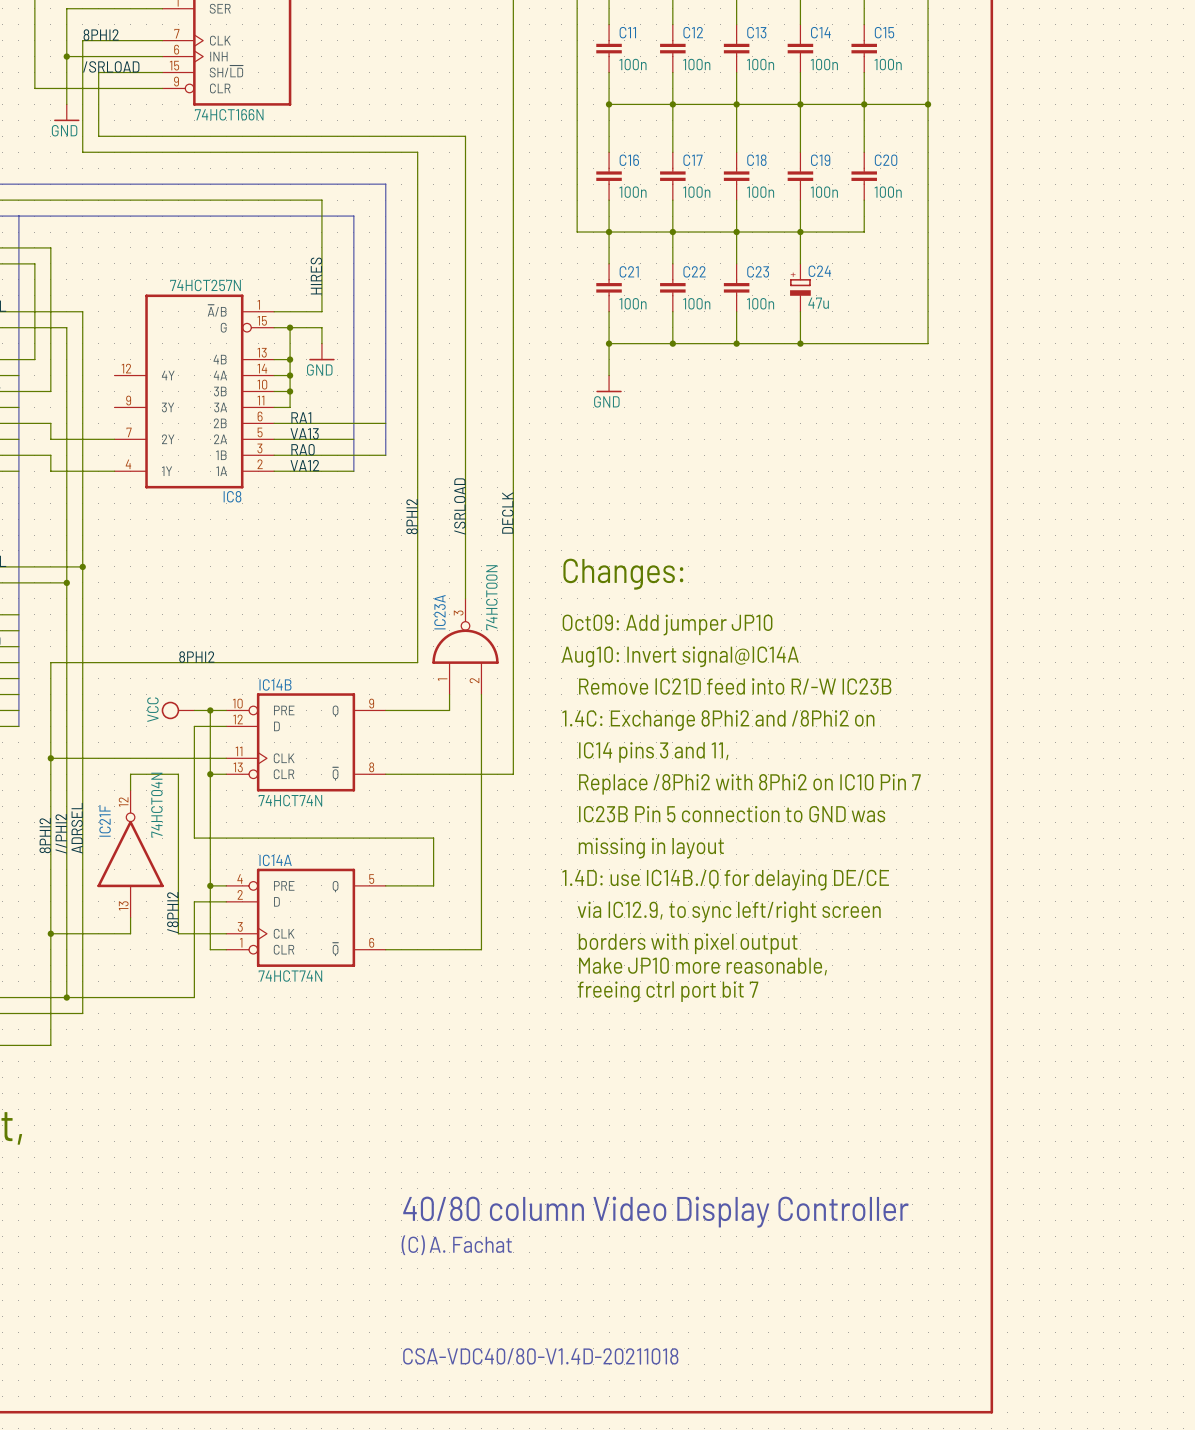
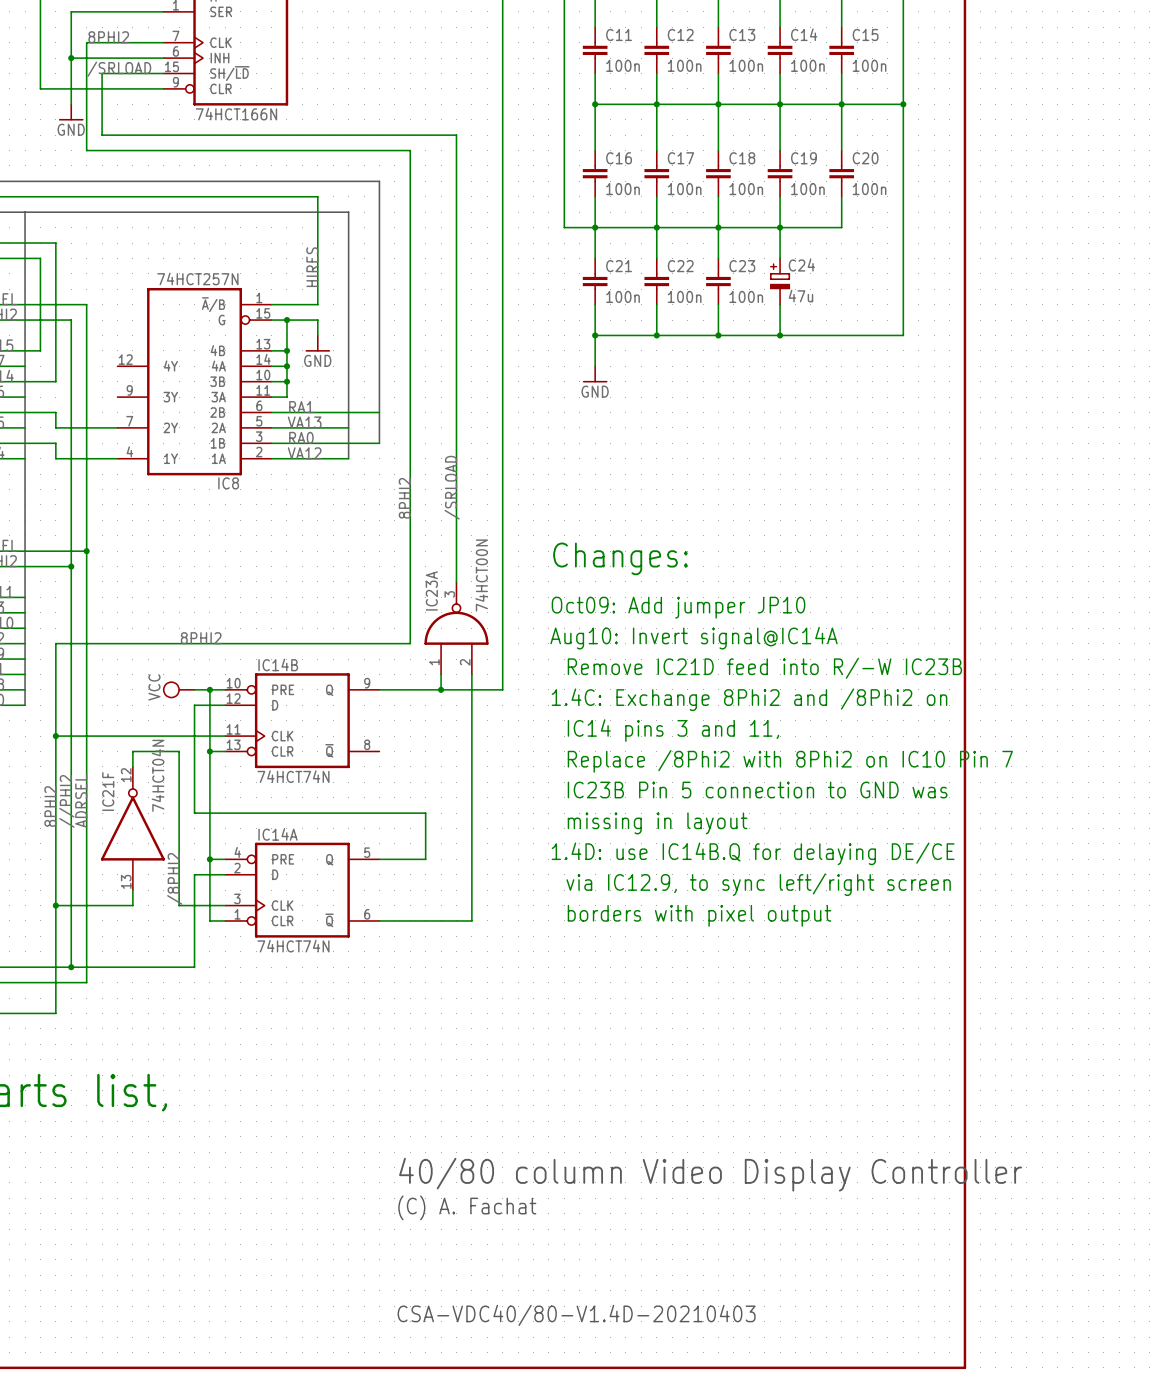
label: DECLK (507, 512) -> none
junction: none -> (441, 689)
wire: (513, 710) (513, 774) (385, 774) -> (502, 689) (441, 689)
text: 1.4D: use IC14B./Q for delaying DE/CE (725, 880) -> 1.4D: use IC14B.Q for delaying DE/CE (753, 853)
text: Make JP10 more reasonable, (703, 966) -> none
text: freeing ctrl port bit 7 (668, 991) -> none
text: CSA-VDC40/80-V1.4D-20211018 (540, 1356) -> CSA-VDC40/80-V1.4D-20210403 (576, 1315)

